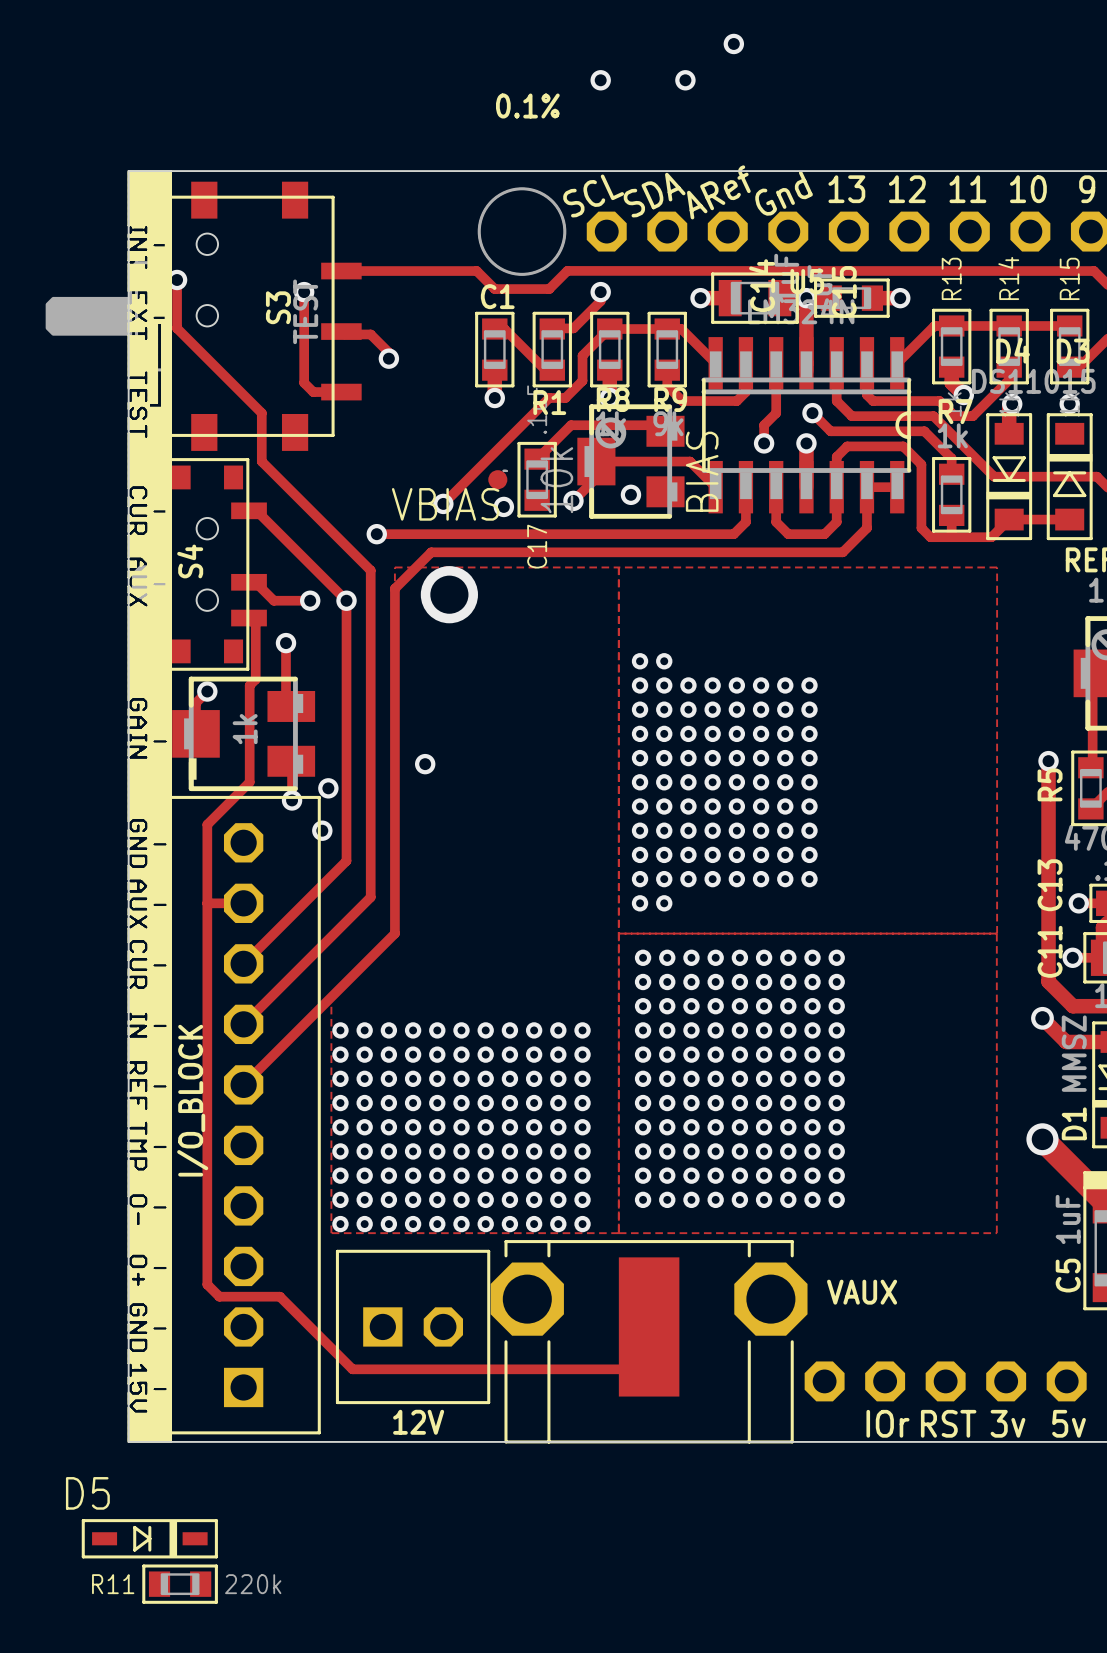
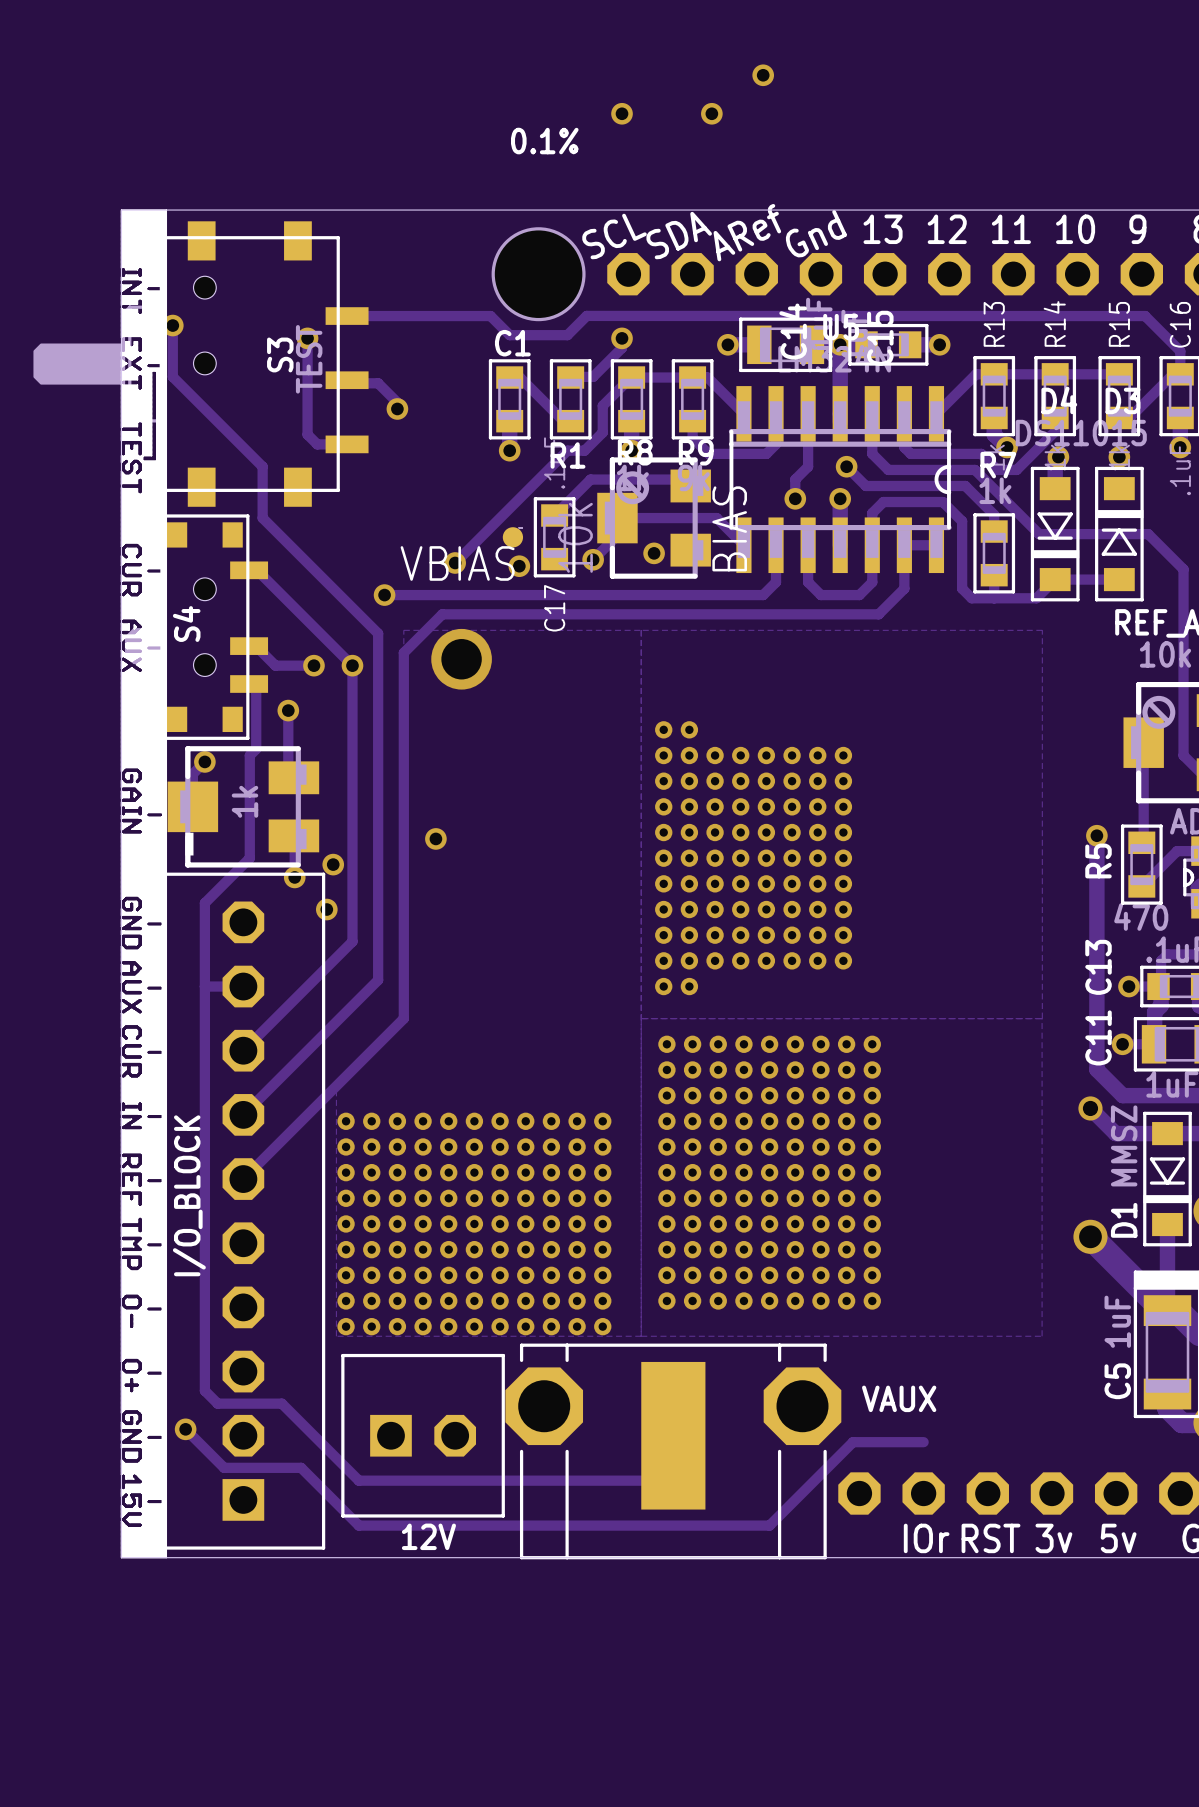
track: none -> (185, 1429) (224, 1467) (301, 1467) (358, 1525) (769, 1525) (853, 1442) (923, 1442)
via: none -> (185, 1429)
D5: (149, 1538) -> none
R11: 220k (180, 1584) -> none

